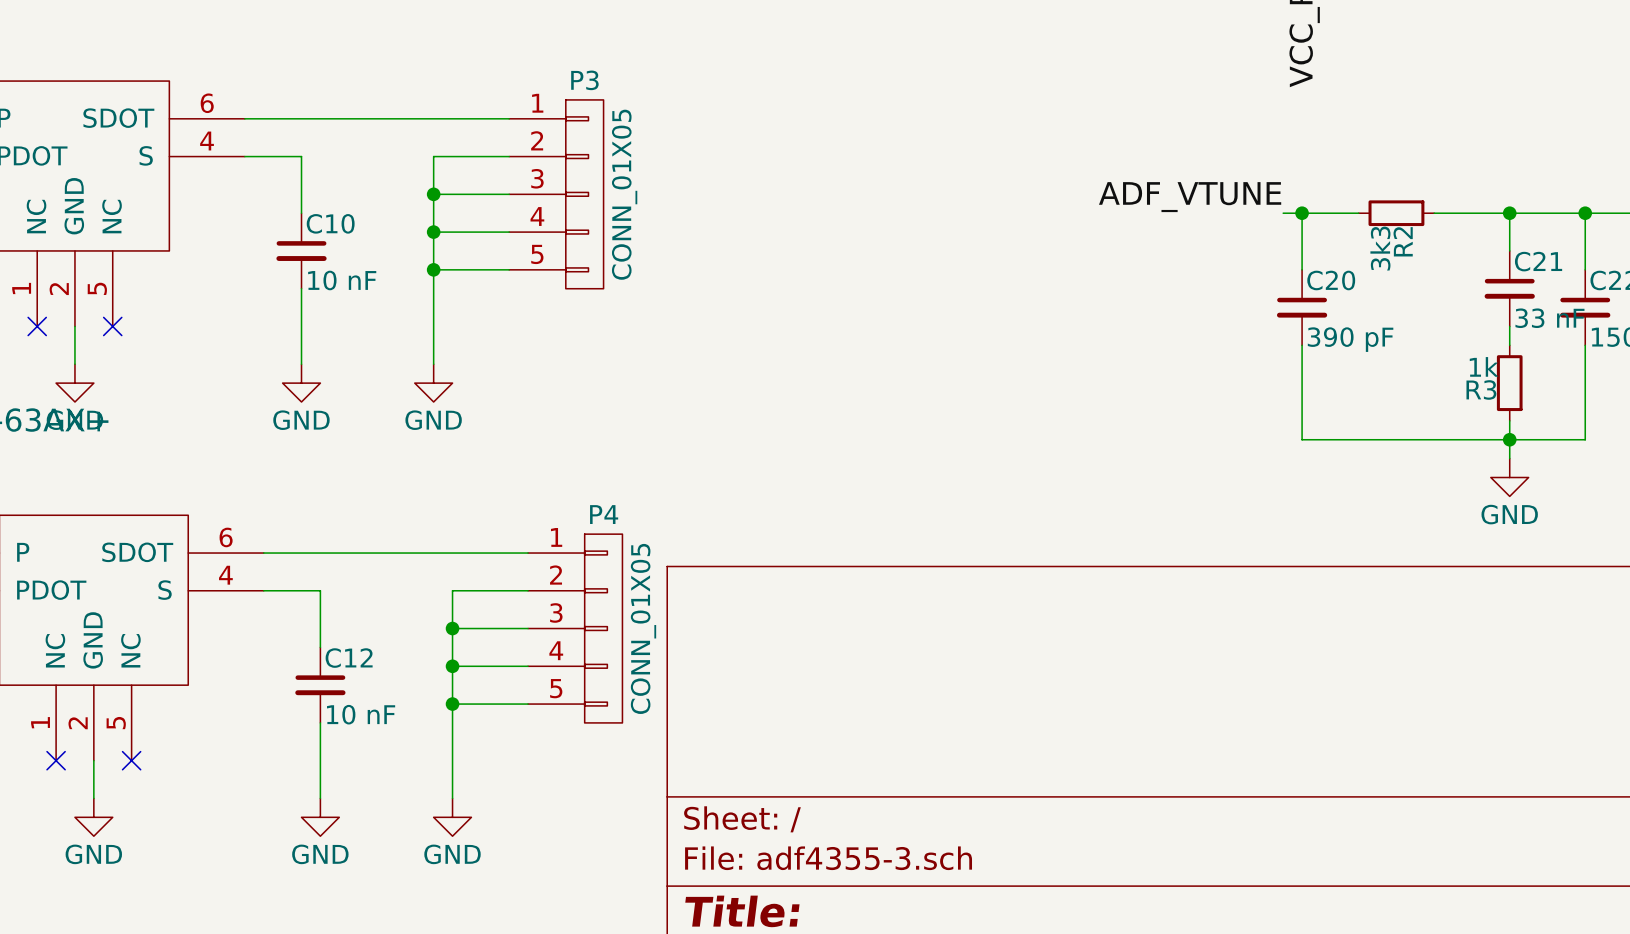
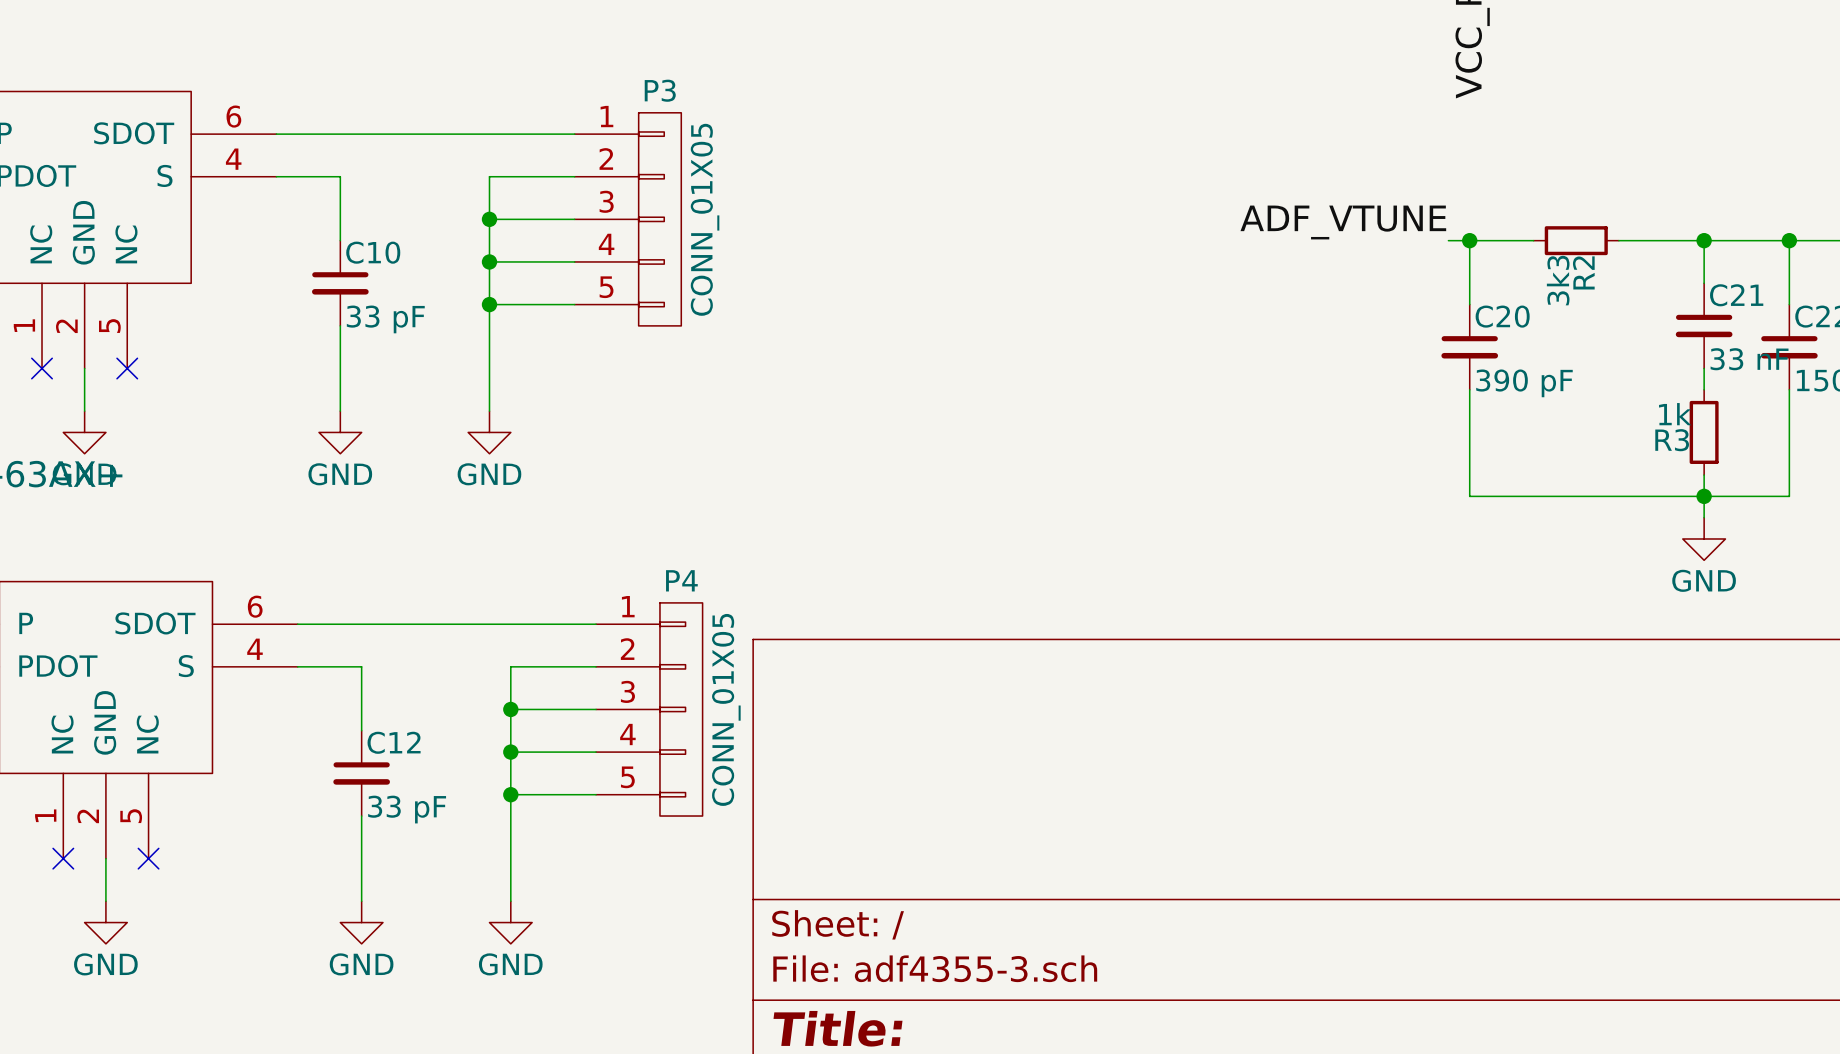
C10 value: 10 nF (342, 280) -> 33 pF (385, 319)
C12 value: 10 nF (361, 714) -> 33 pF (407, 809)

